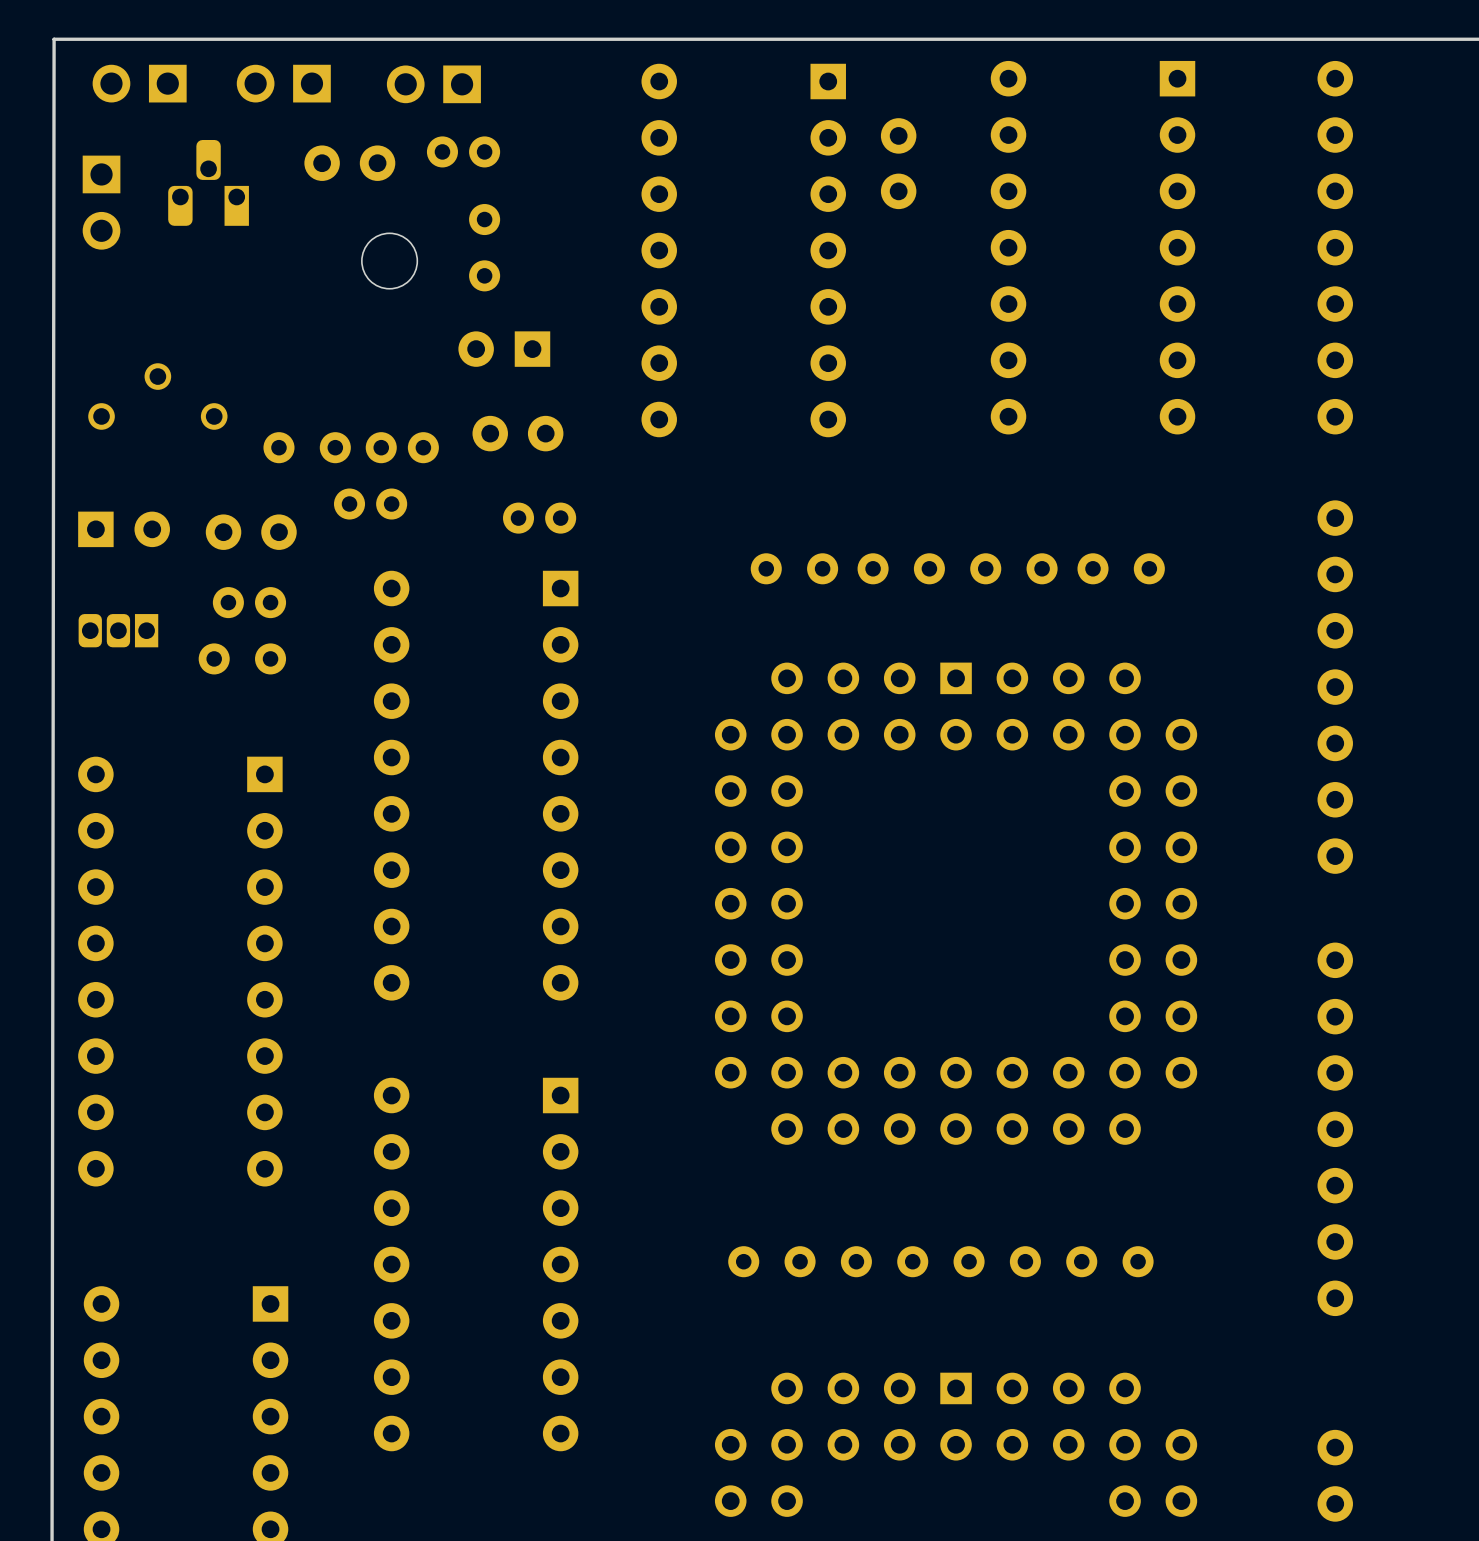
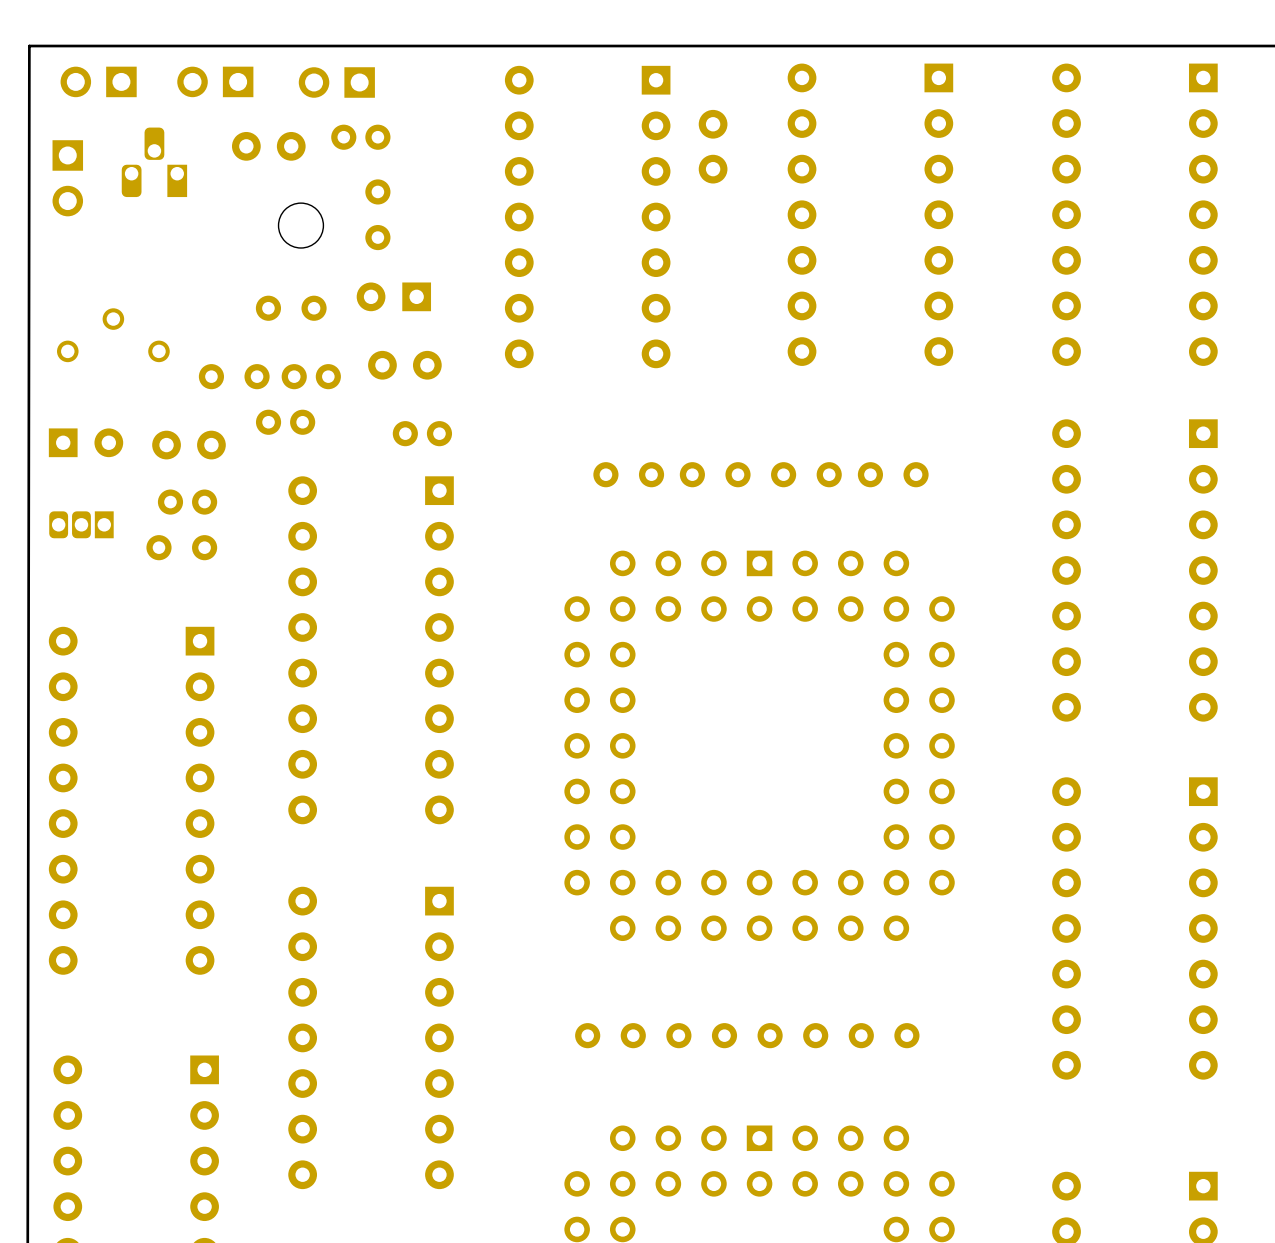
part: none -> (291, 308)

